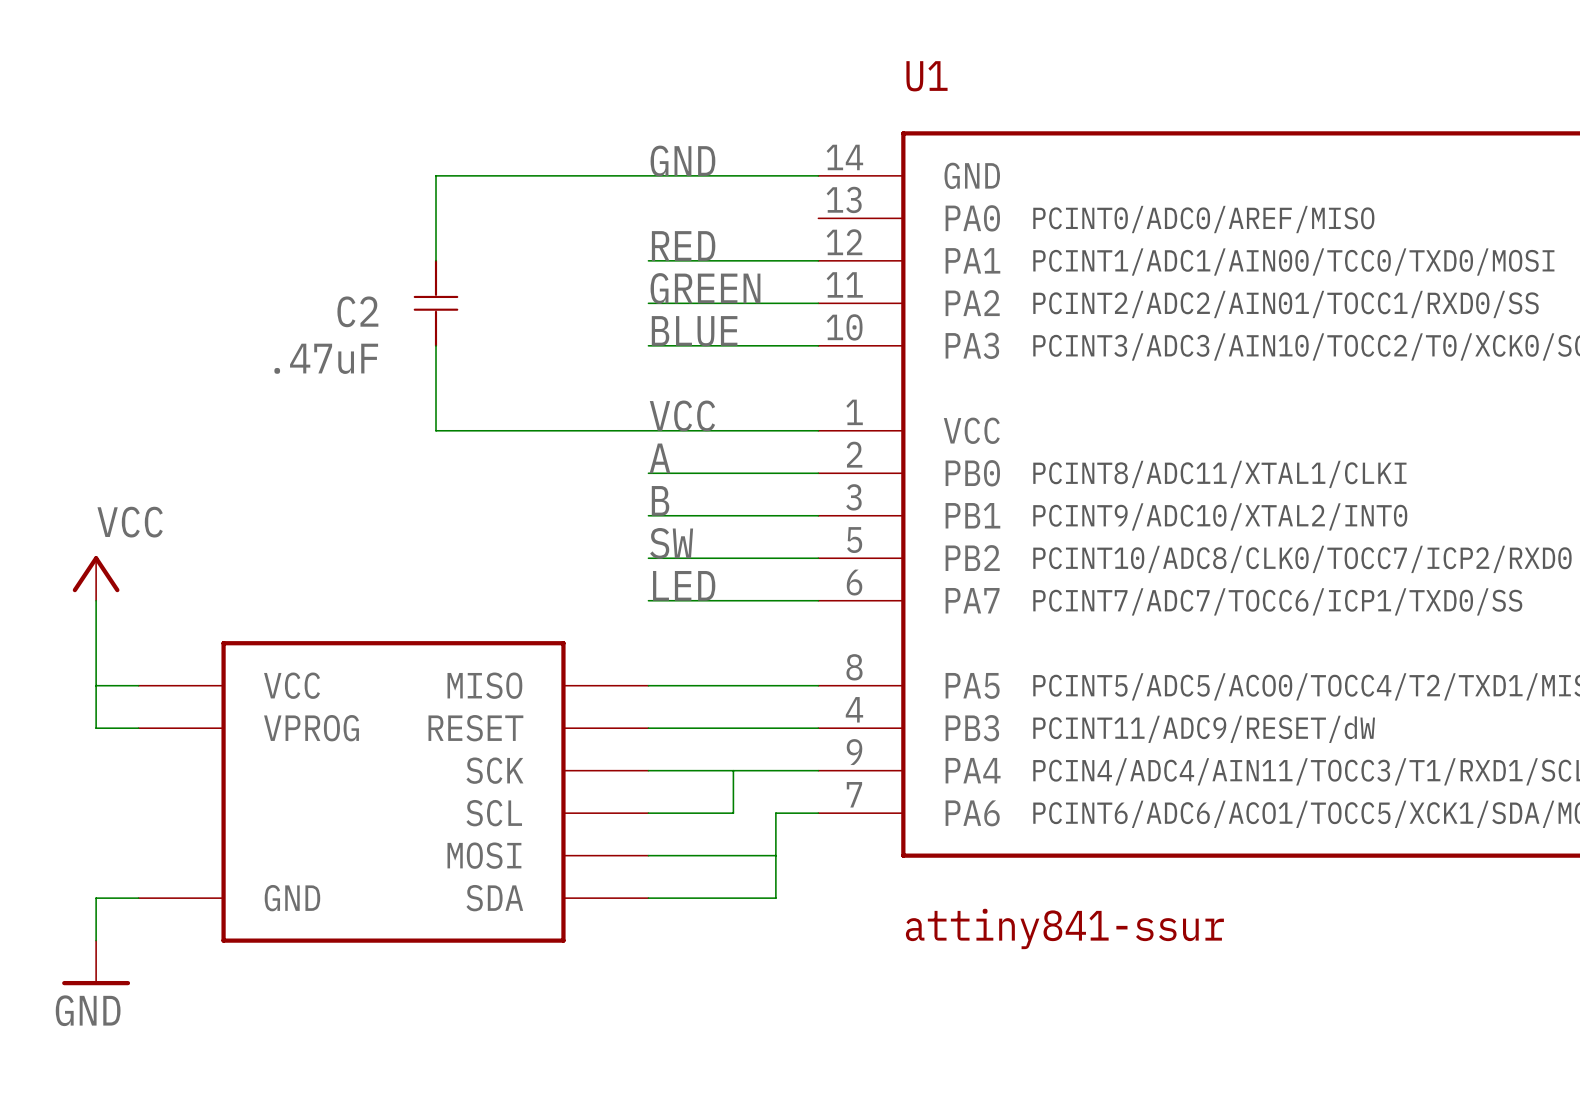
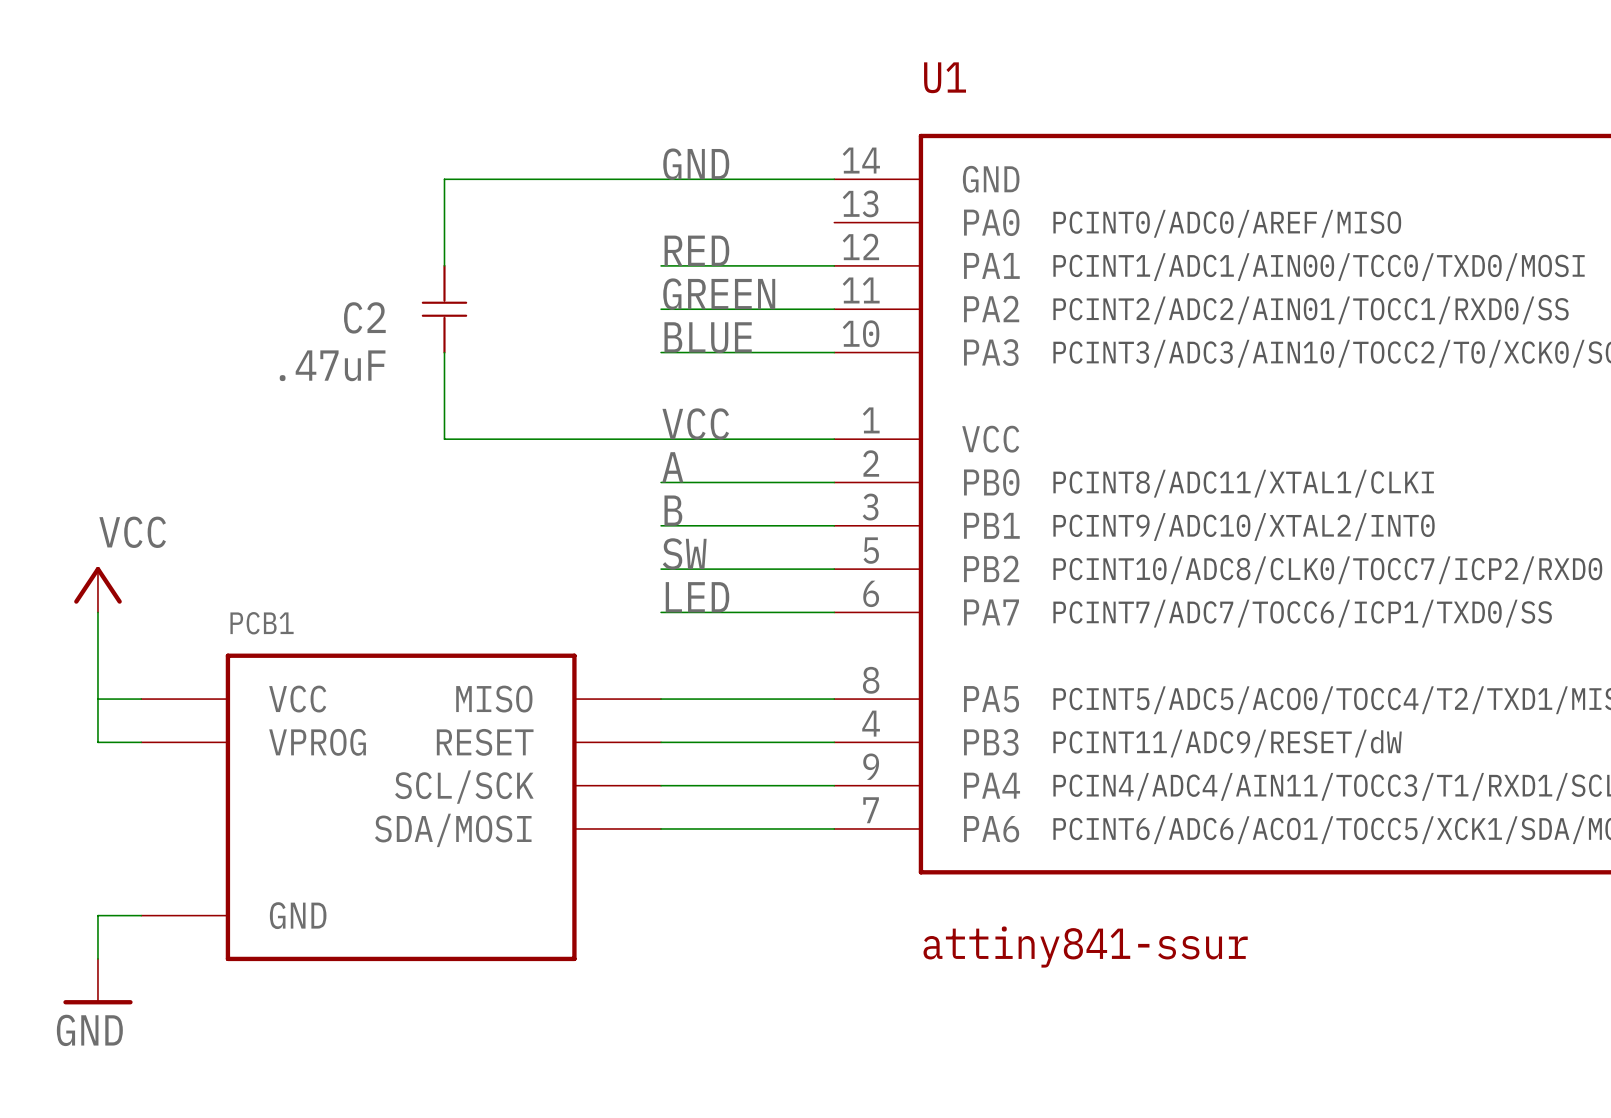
wire: (733, 770) (733, 813) -> (790, 828) (747, 828)
part: (393, 791) -> none
PCB1: none -> (401, 807)
wire: (775, 813) (775, 898) (648, 898) -> none
wire: (648, 855) (775, 855) -> none

